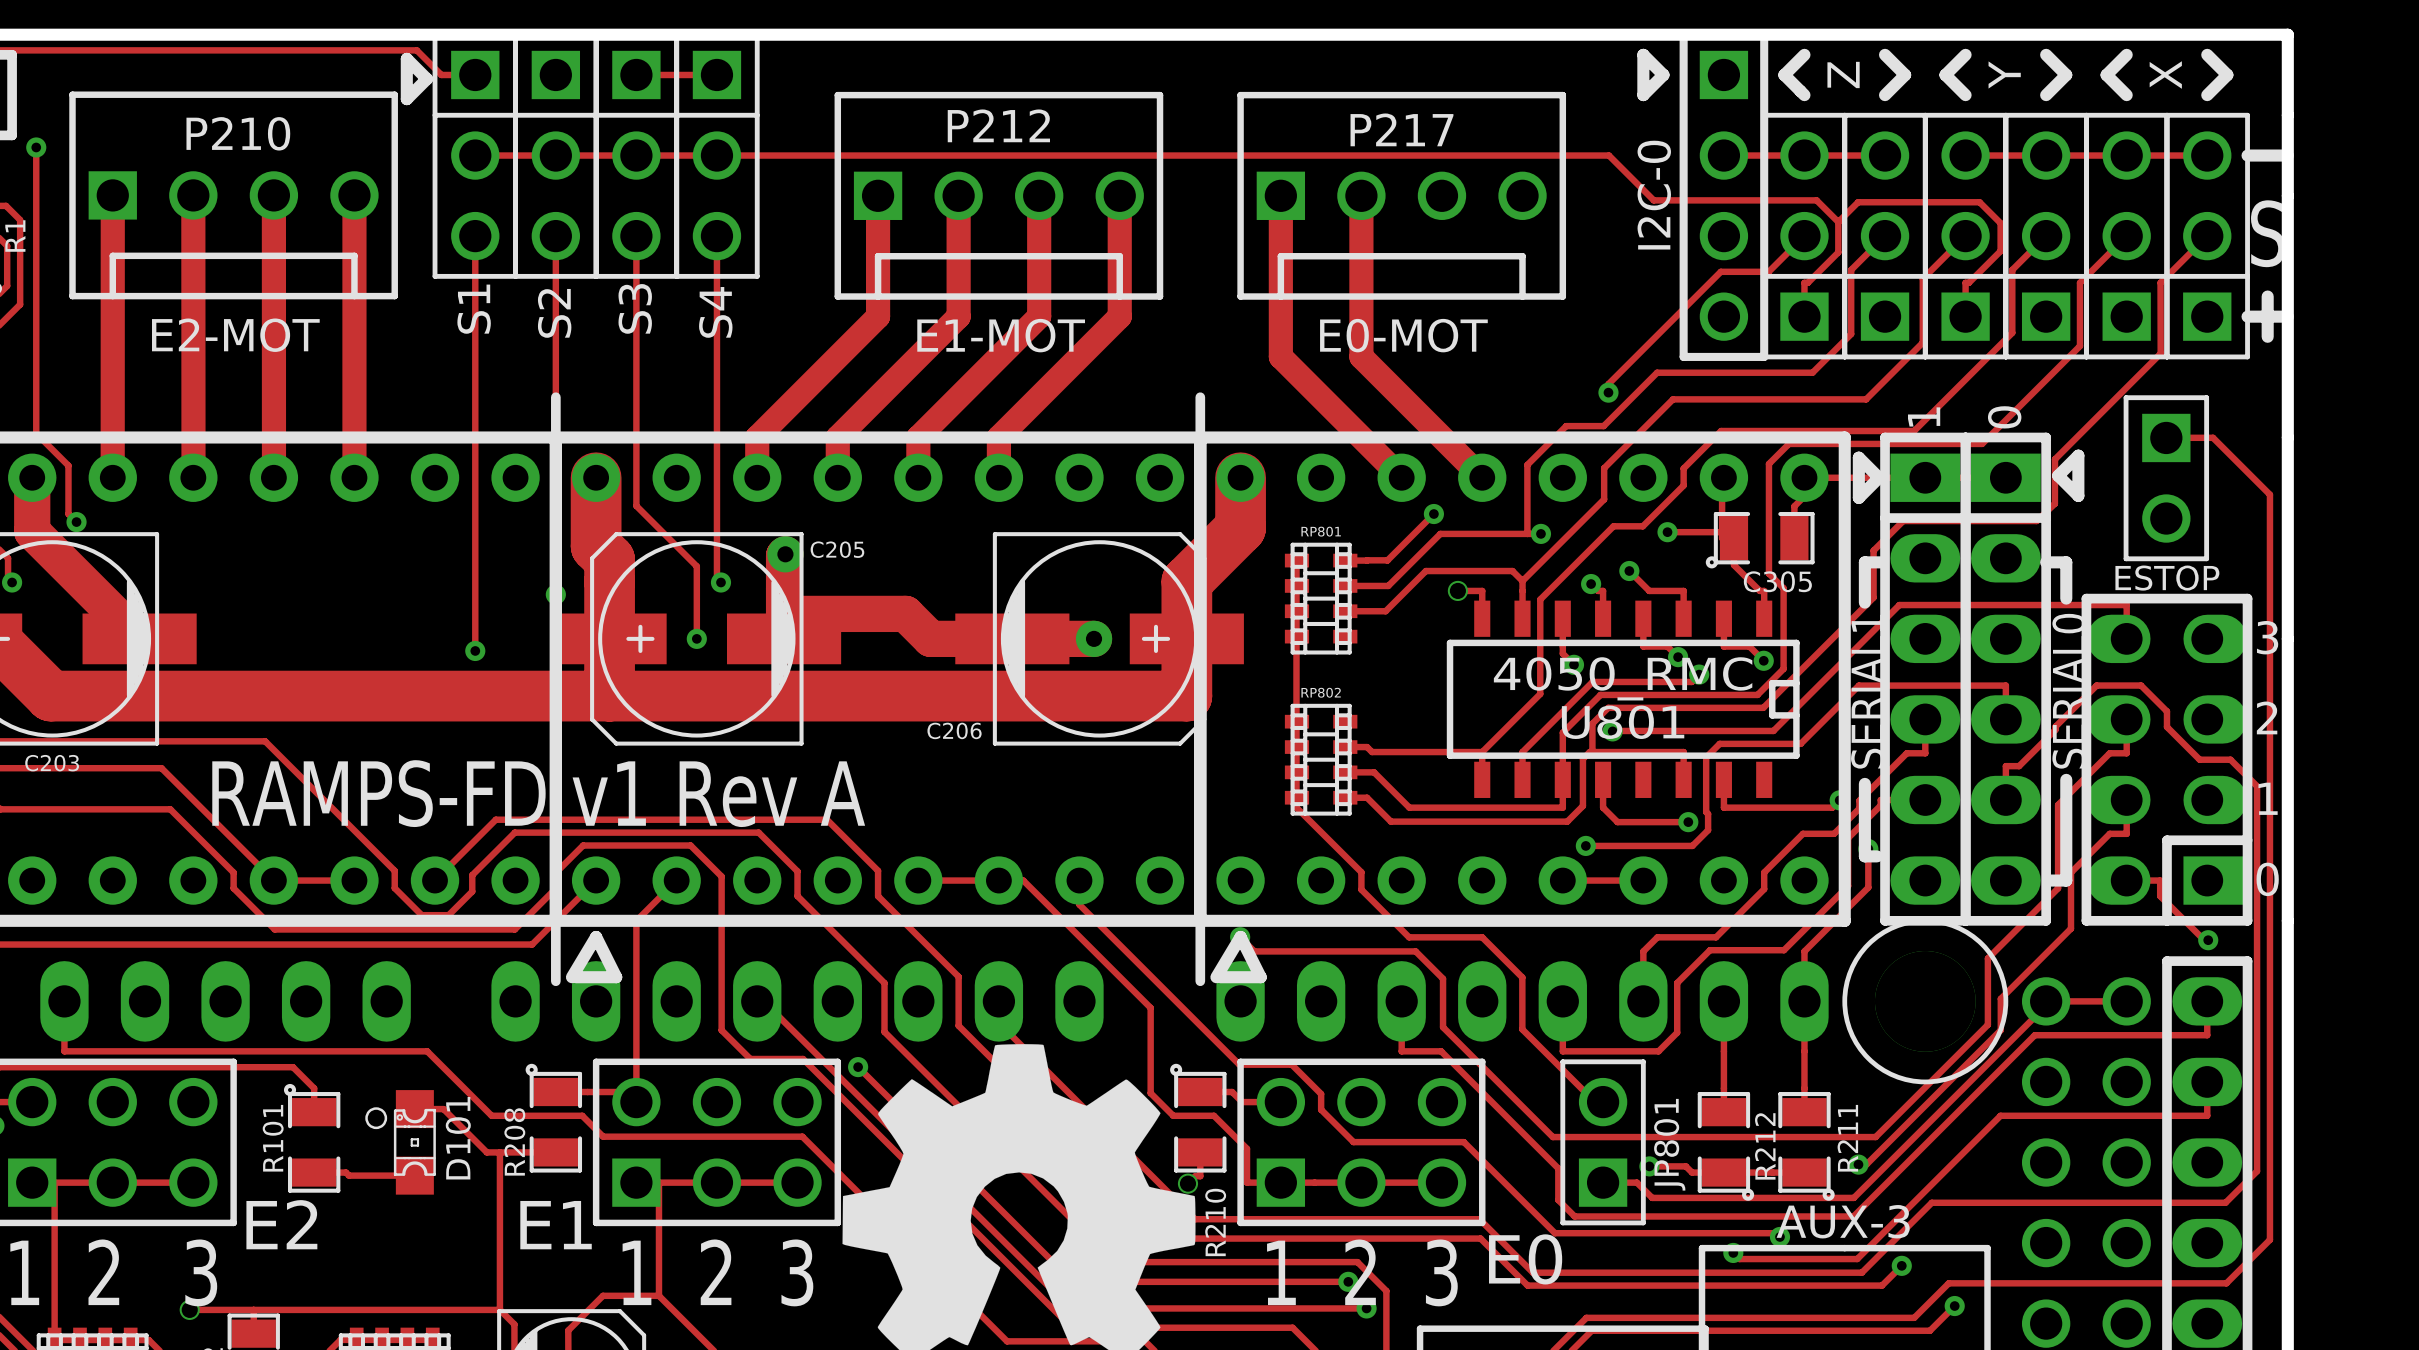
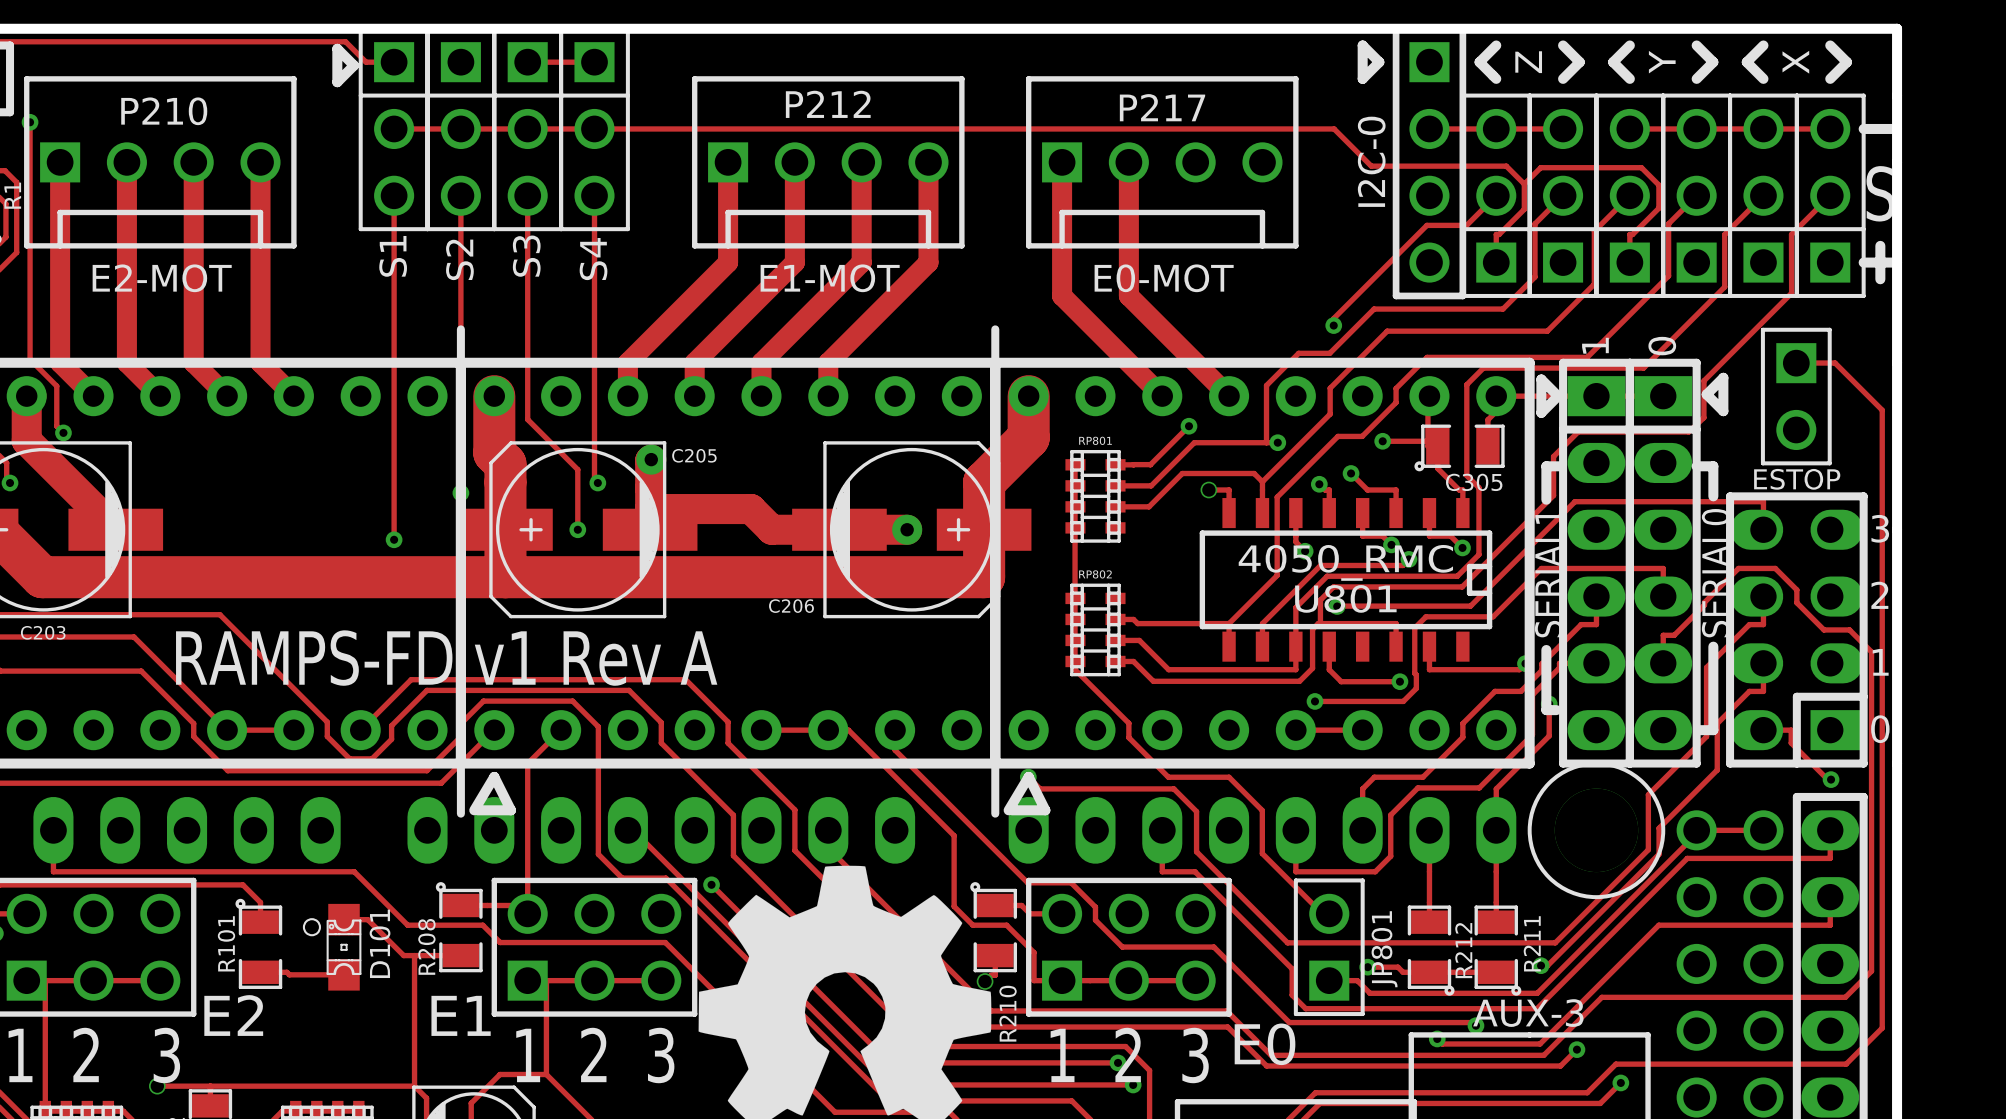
track: (112, 195) (112, 477) -> (60, 162) (60, 362) (93, 396)
track: (193, 195) (193, 478) -> (126, 162) (126, 362) (160, 396)
P210 position: (233, 195) -> (160, 162)
track: (273, 195) (273, 477) -> (193, 162) (193, 362) (227, 396)
track: (354, 195) (354, 478) -> (260, 162) (260, 362) (293, 396)

